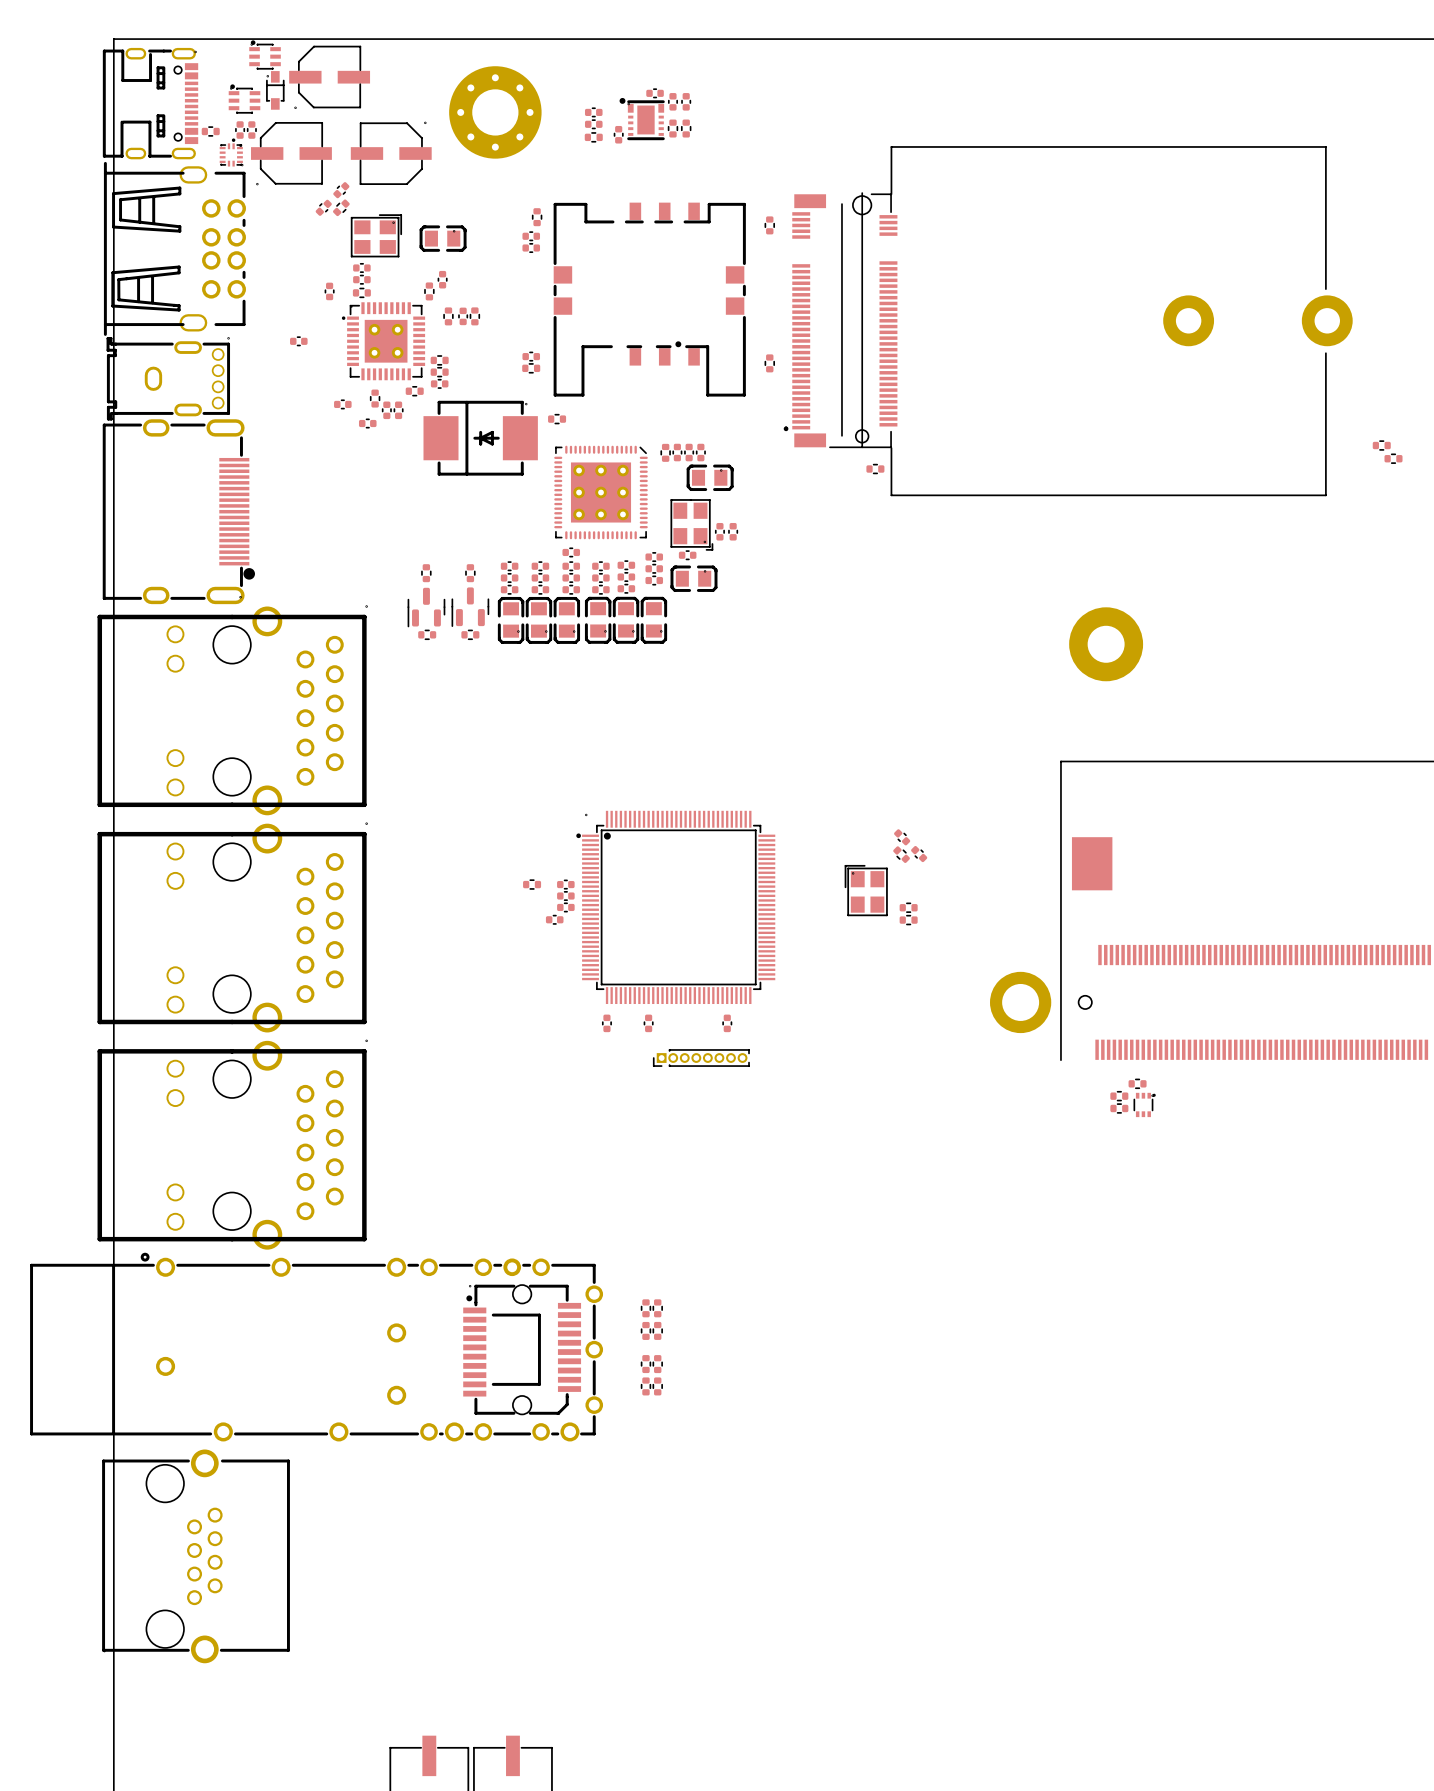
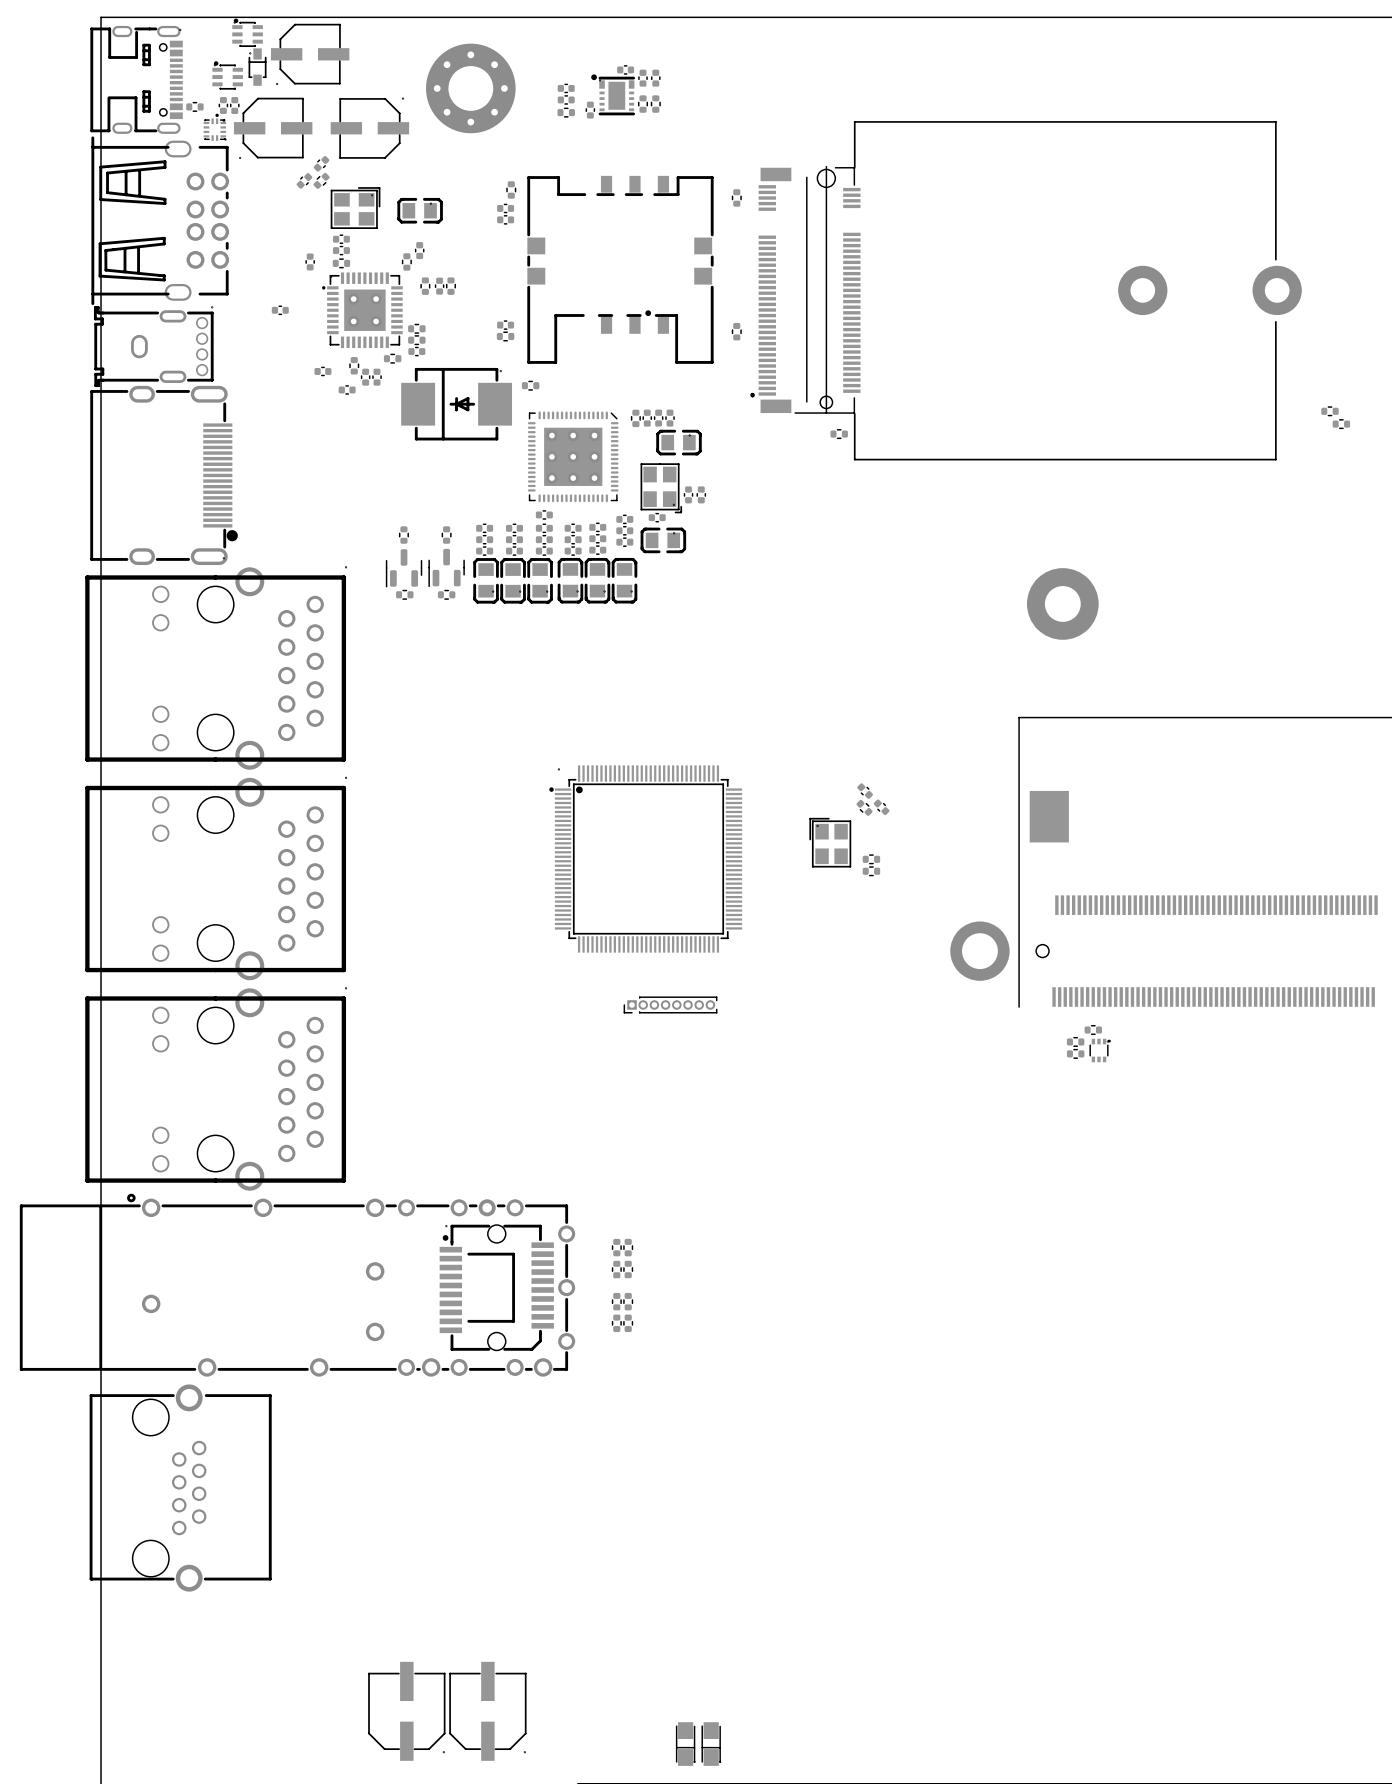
part: (532, 884) -> none
part: (565, 884) -> none
part: (565, 896) -> none
part: (565, 907) -> none
part: (554, 919) -> none
part: (606, 1023) -> none
part: (648, 1023) -> none
part: (727, 1023) -> none

